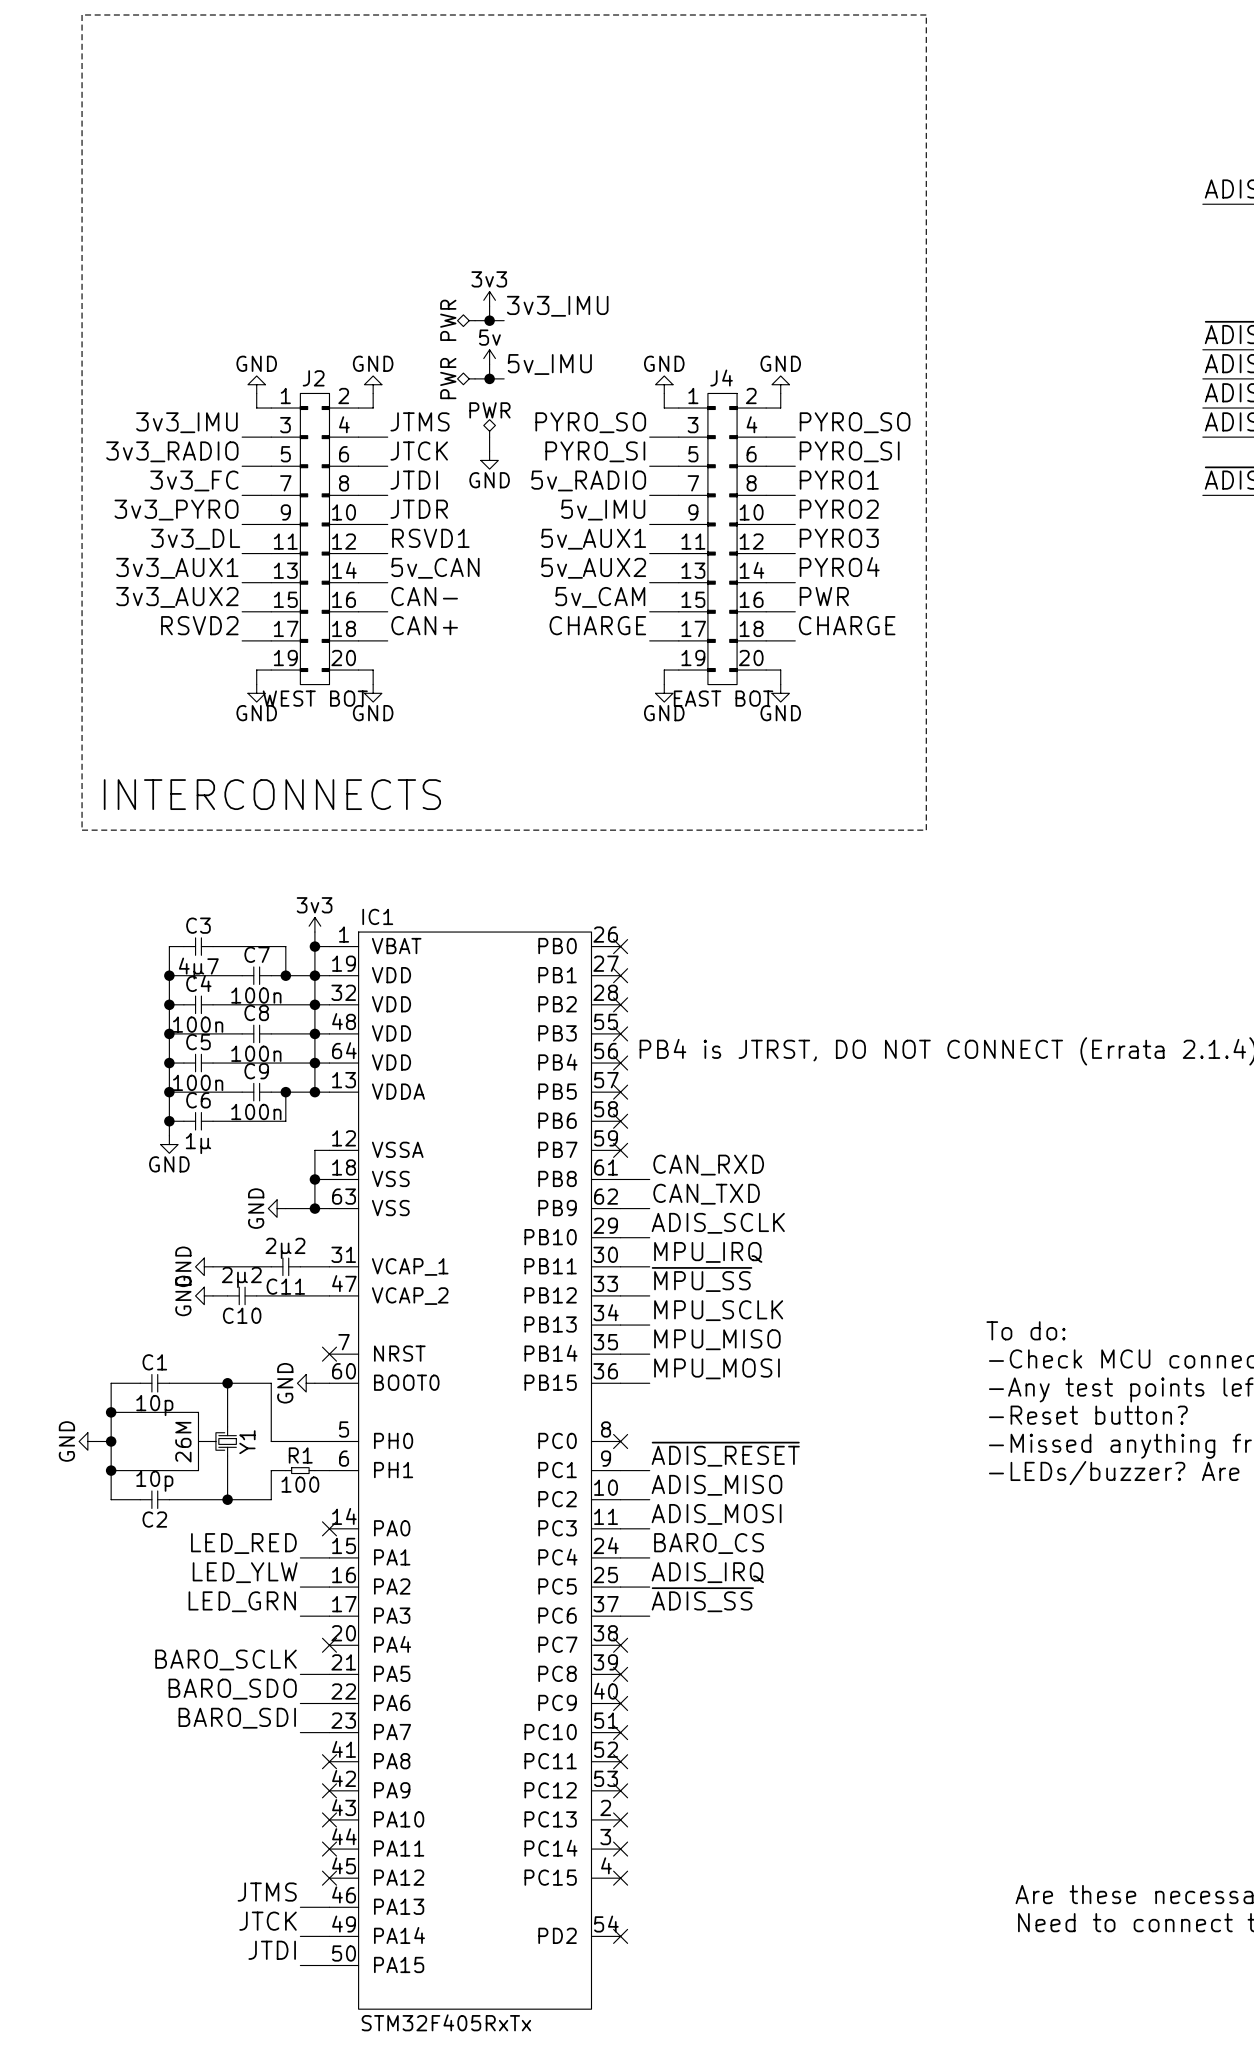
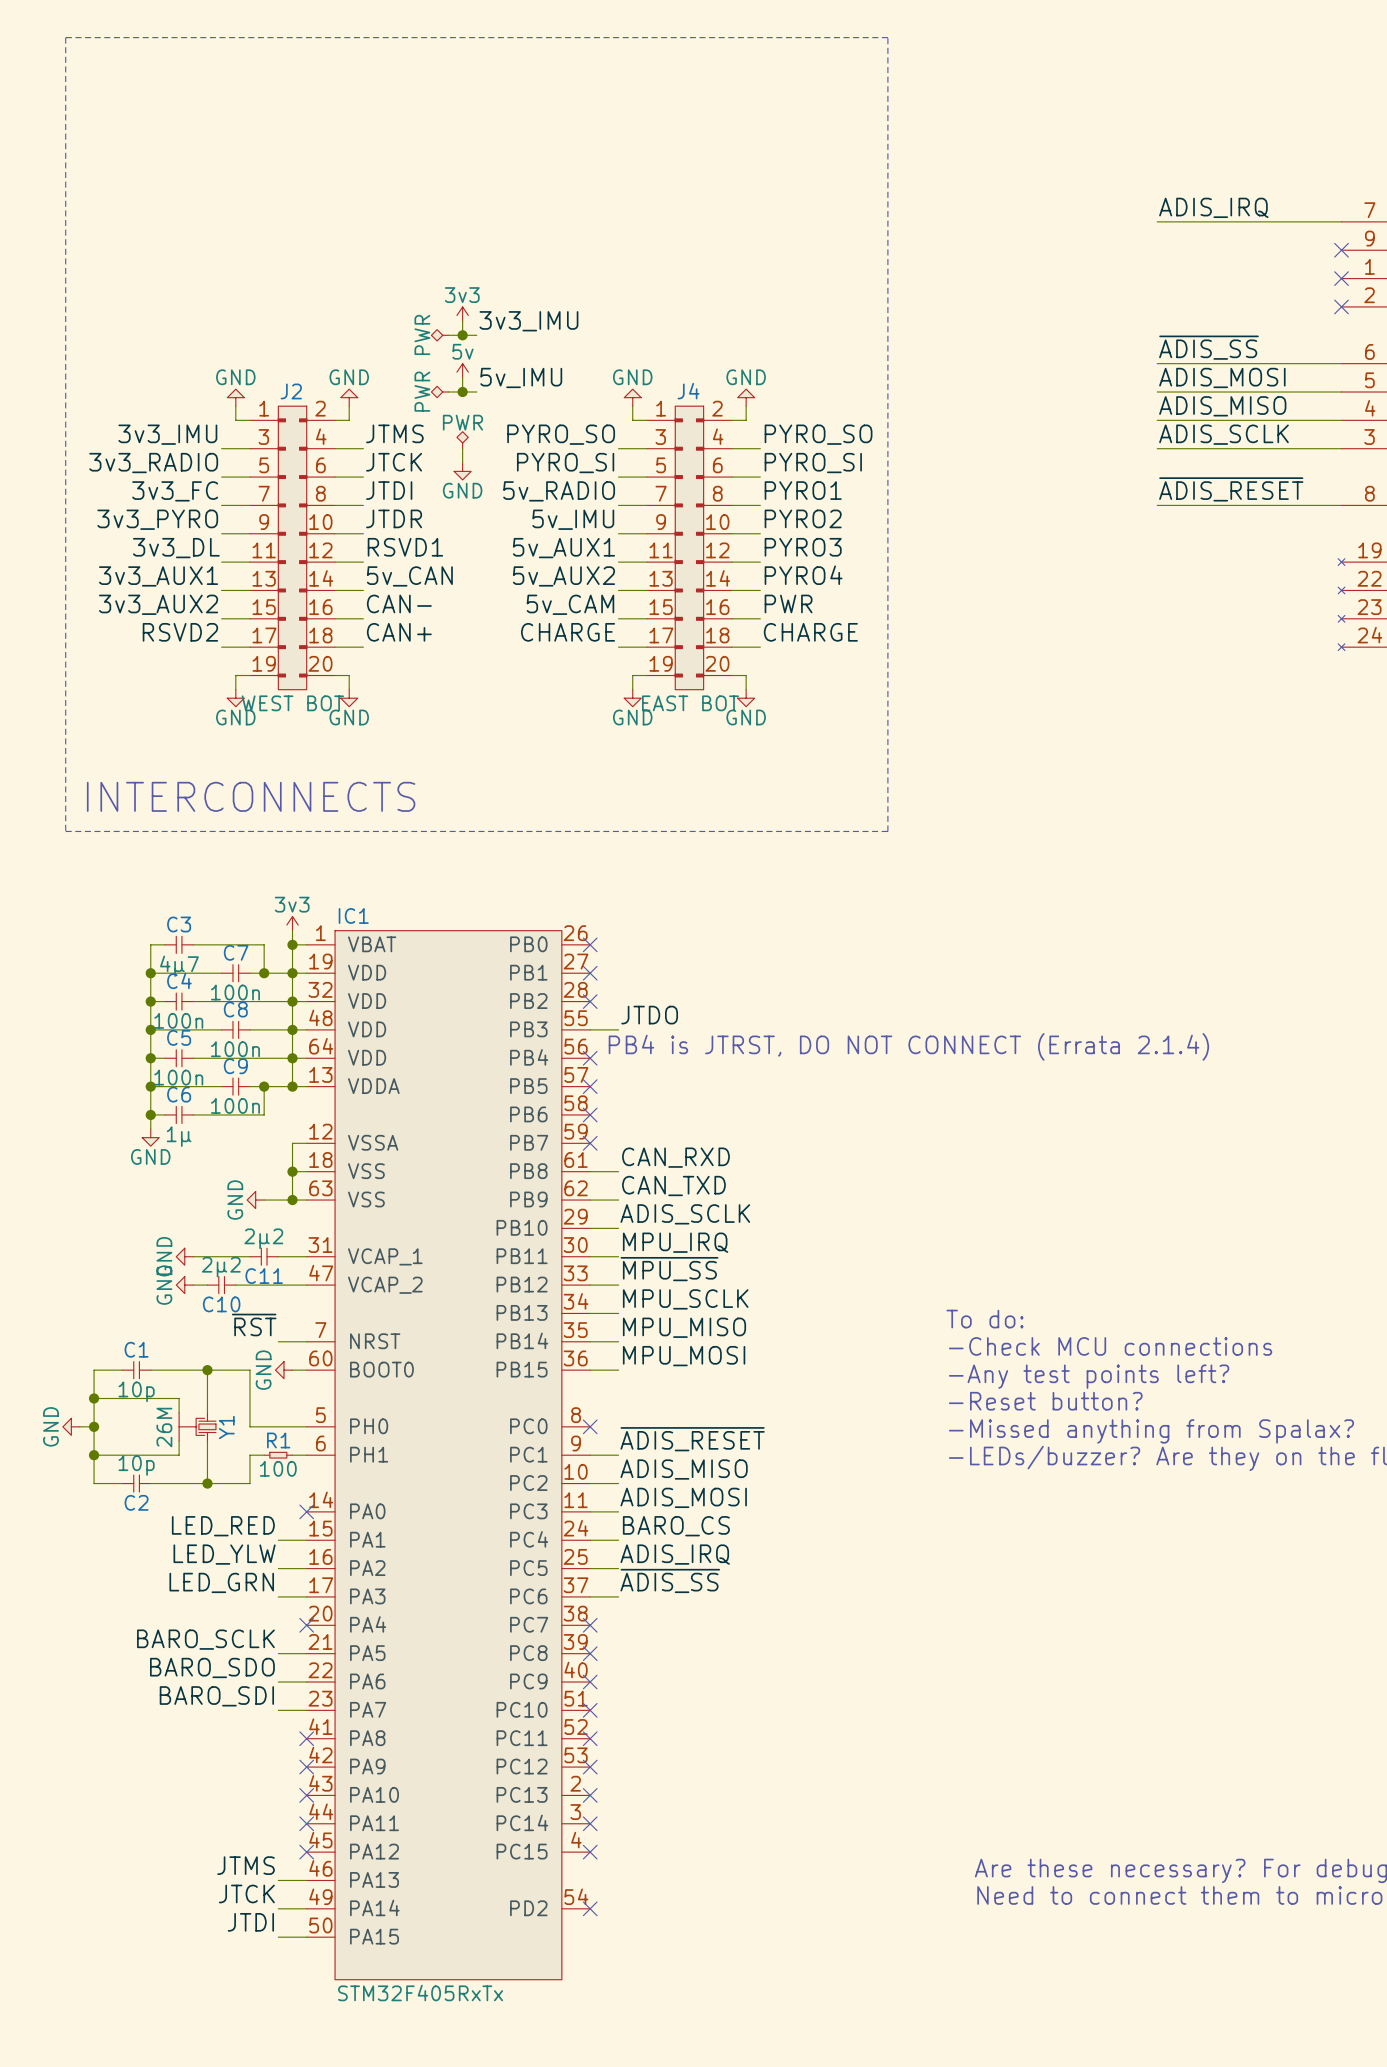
label: none -> JTDO (649, 1015)
wire: none -> (590, 1029) (618, 1029)
no-connect mark: (620, 1033) -> none
label: none -> ~{RST} (254, 1324)
wire: none -> (278, 1341) (306, 1341)
no-connect mark: (329, 1354) -> none

